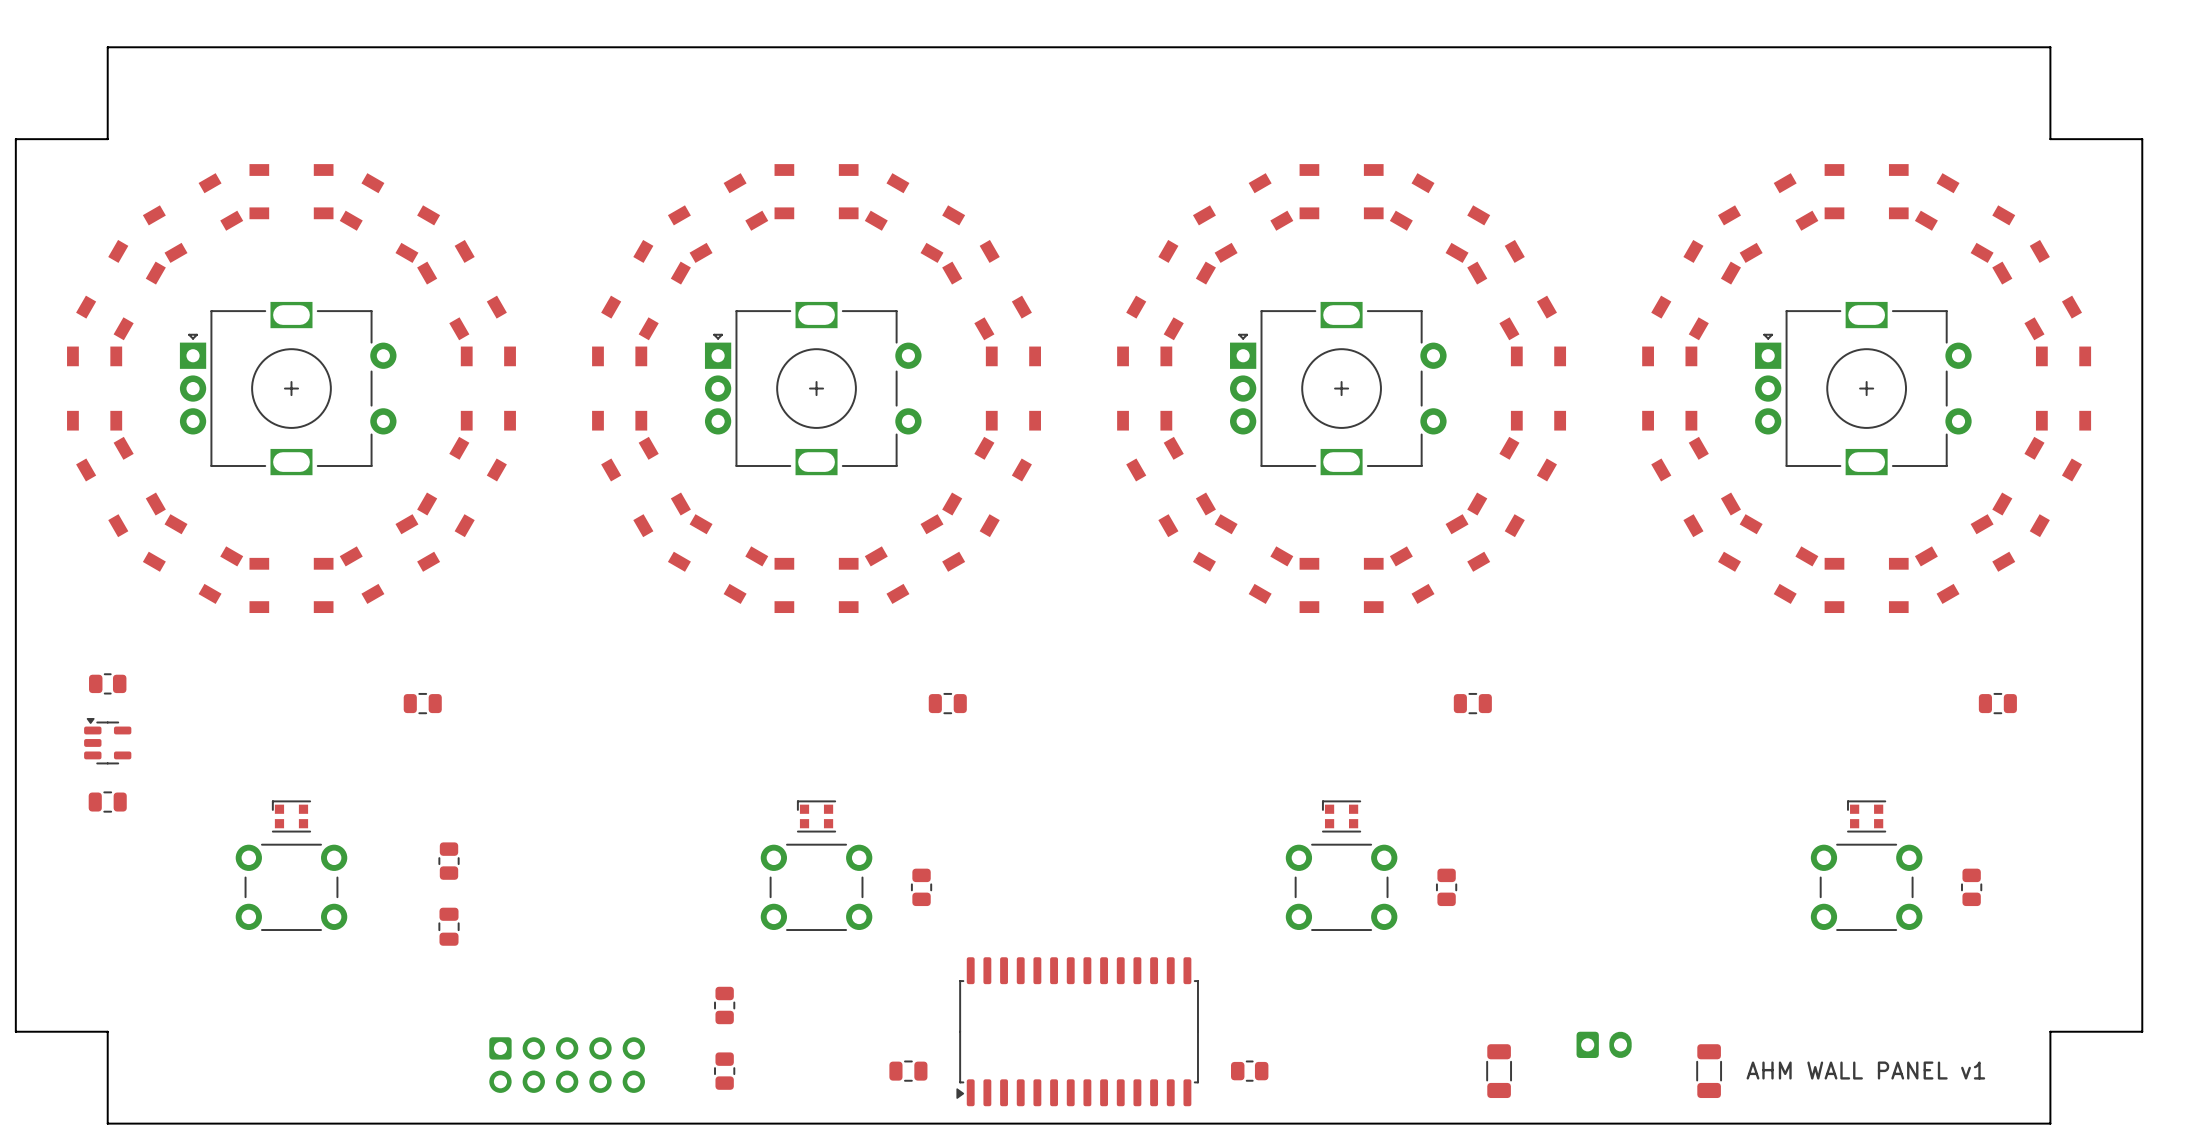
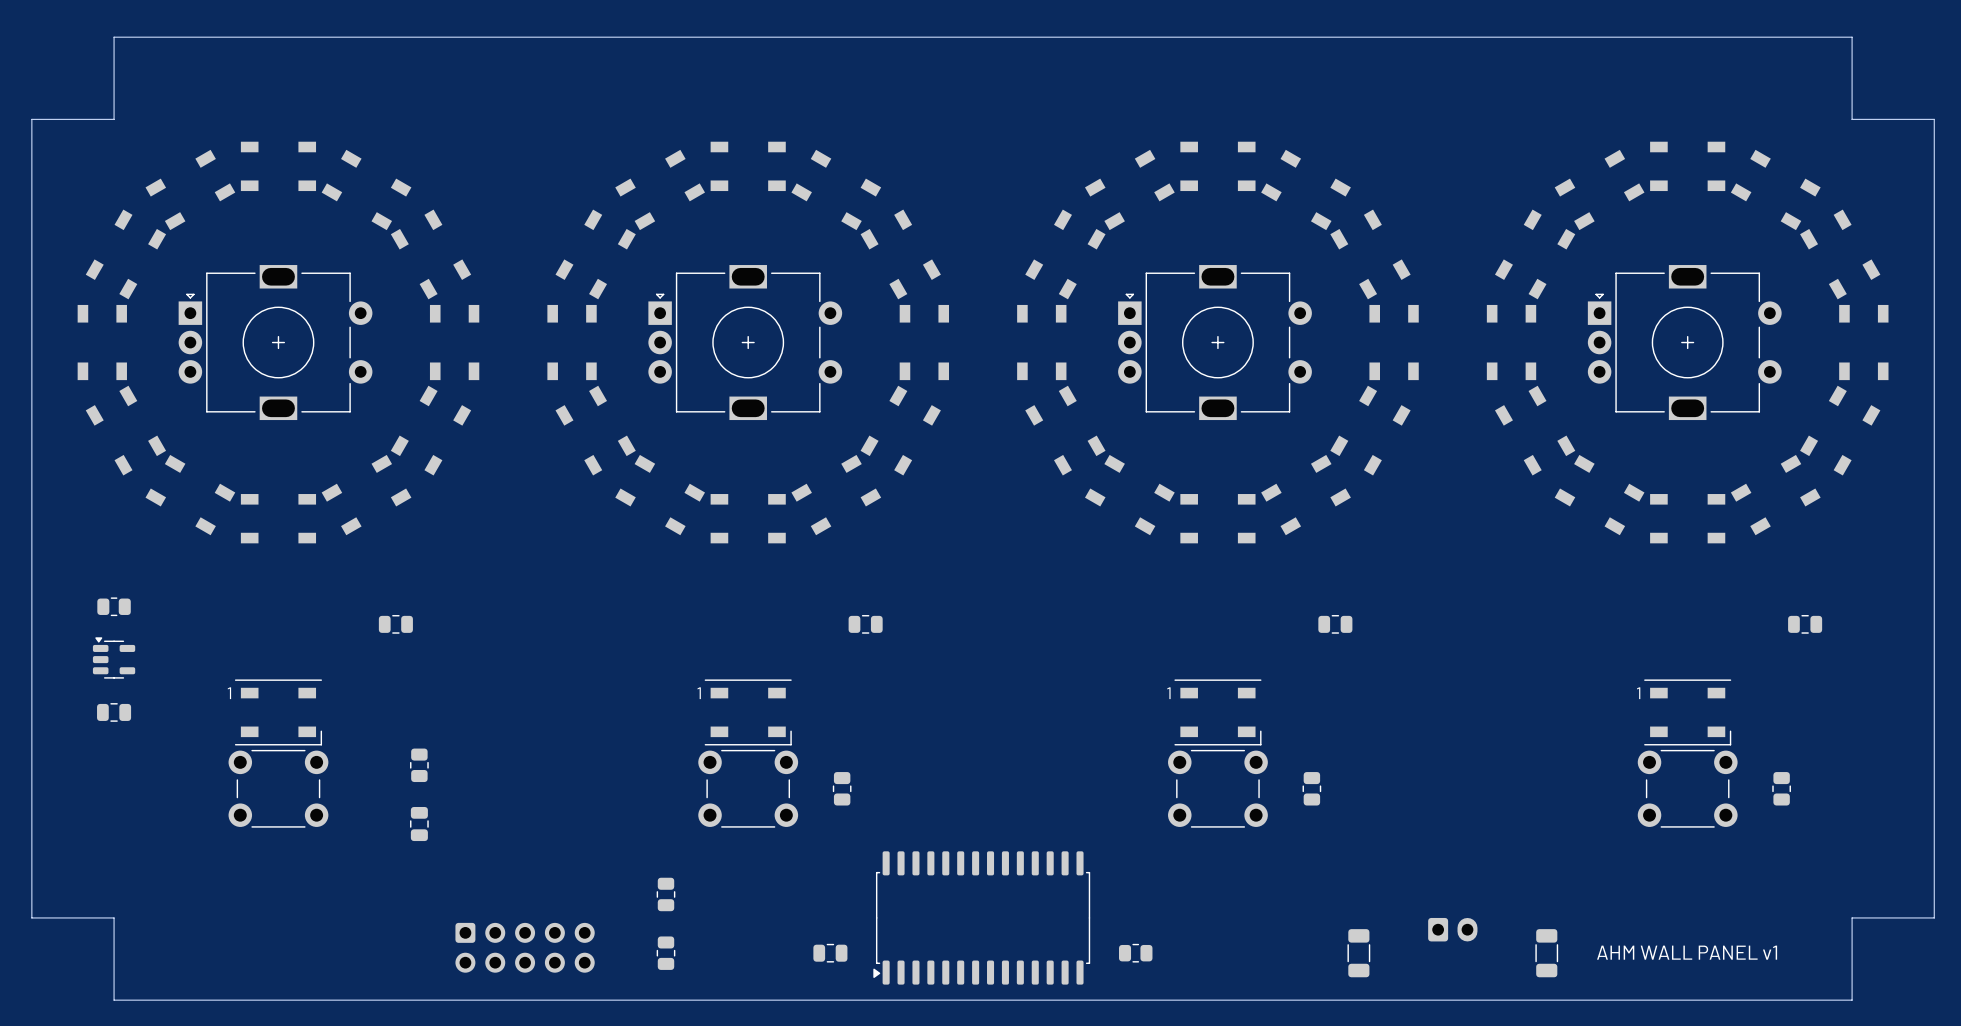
part: none -> (278, 712)
part: none -> (748, 712)
part: none -> (1217, 712)
part: none -> (1687, 712)
part: (291, 816) -> none
part: (816, 816) -> none
part: (1341, 816) -> none
part: (1866, 816) -> none

